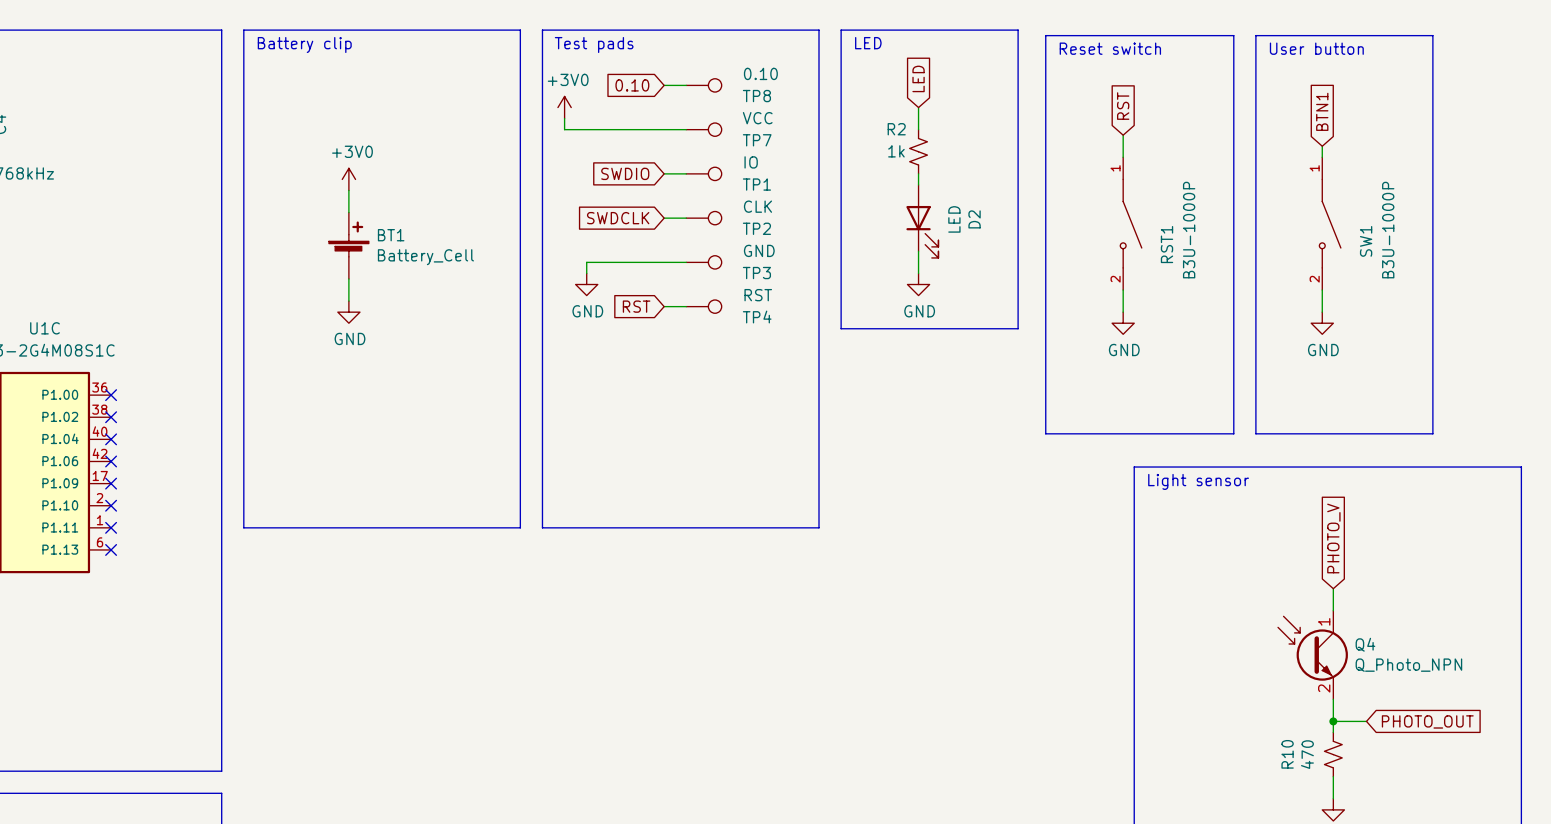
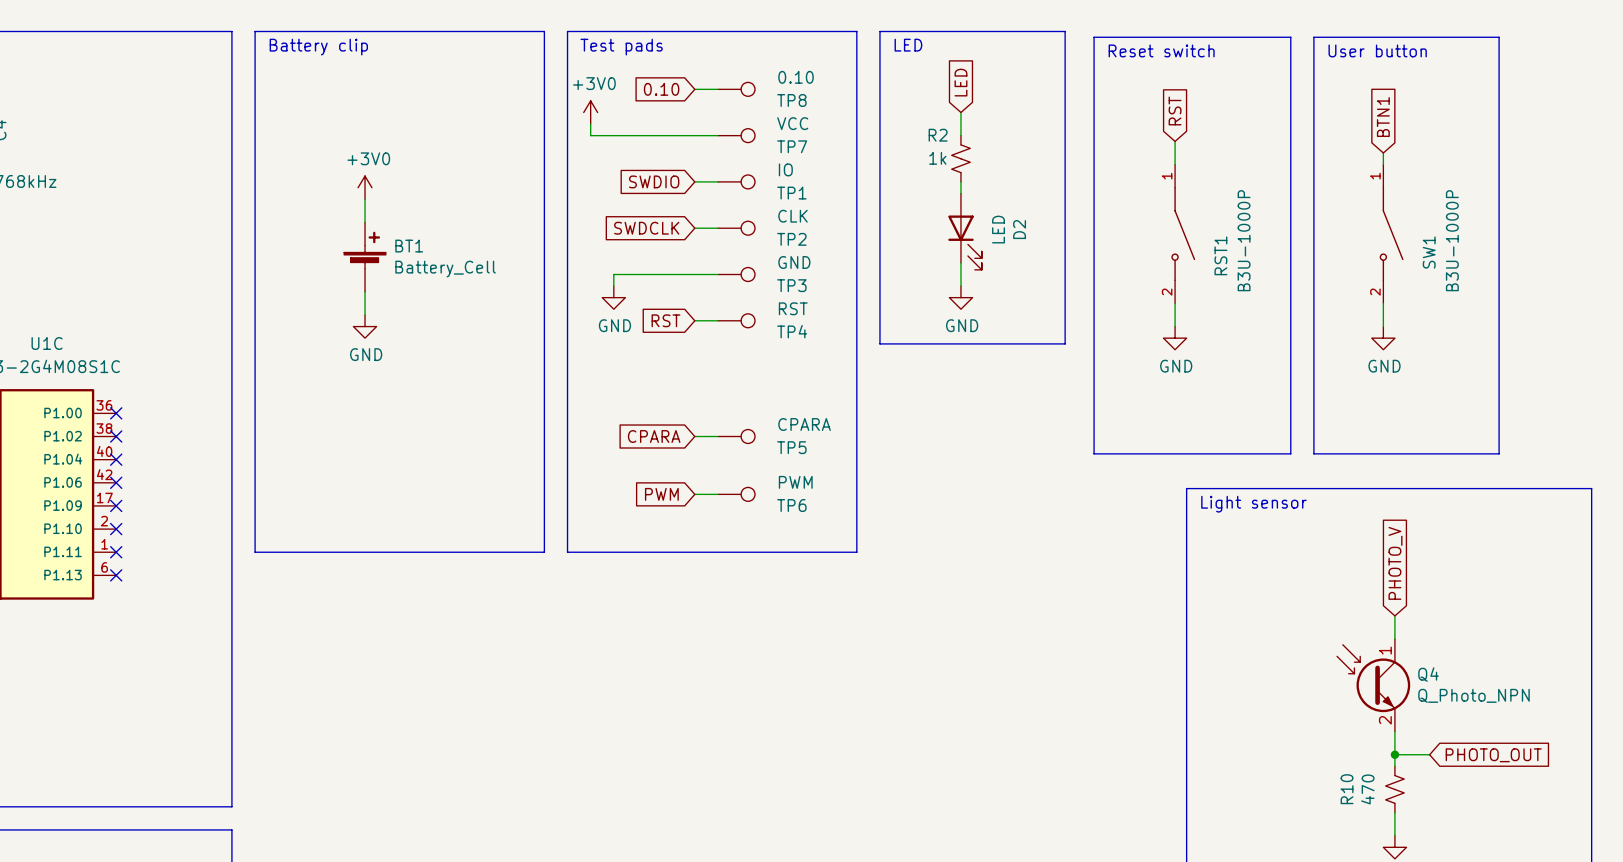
global label: none -> CPARA (654, 436)
wire: none -> (694, 436) (717, 436)
TP5: none -> CPARA (736, 436)
global label: none -> PWM (661, 494)
wire: none -> (694, 494) (717, 494)
TP6: none -> PWM (736, 494)

